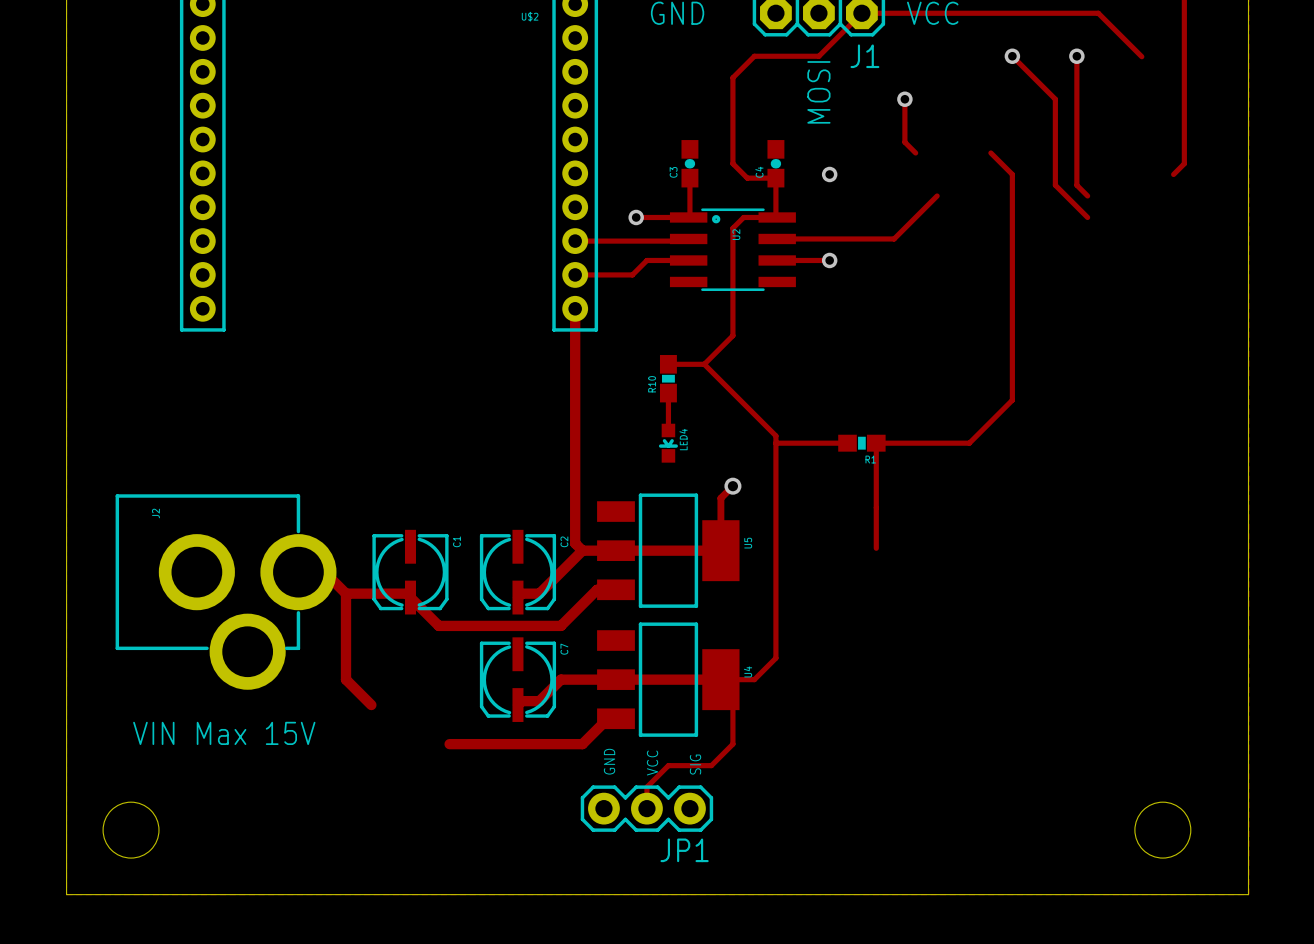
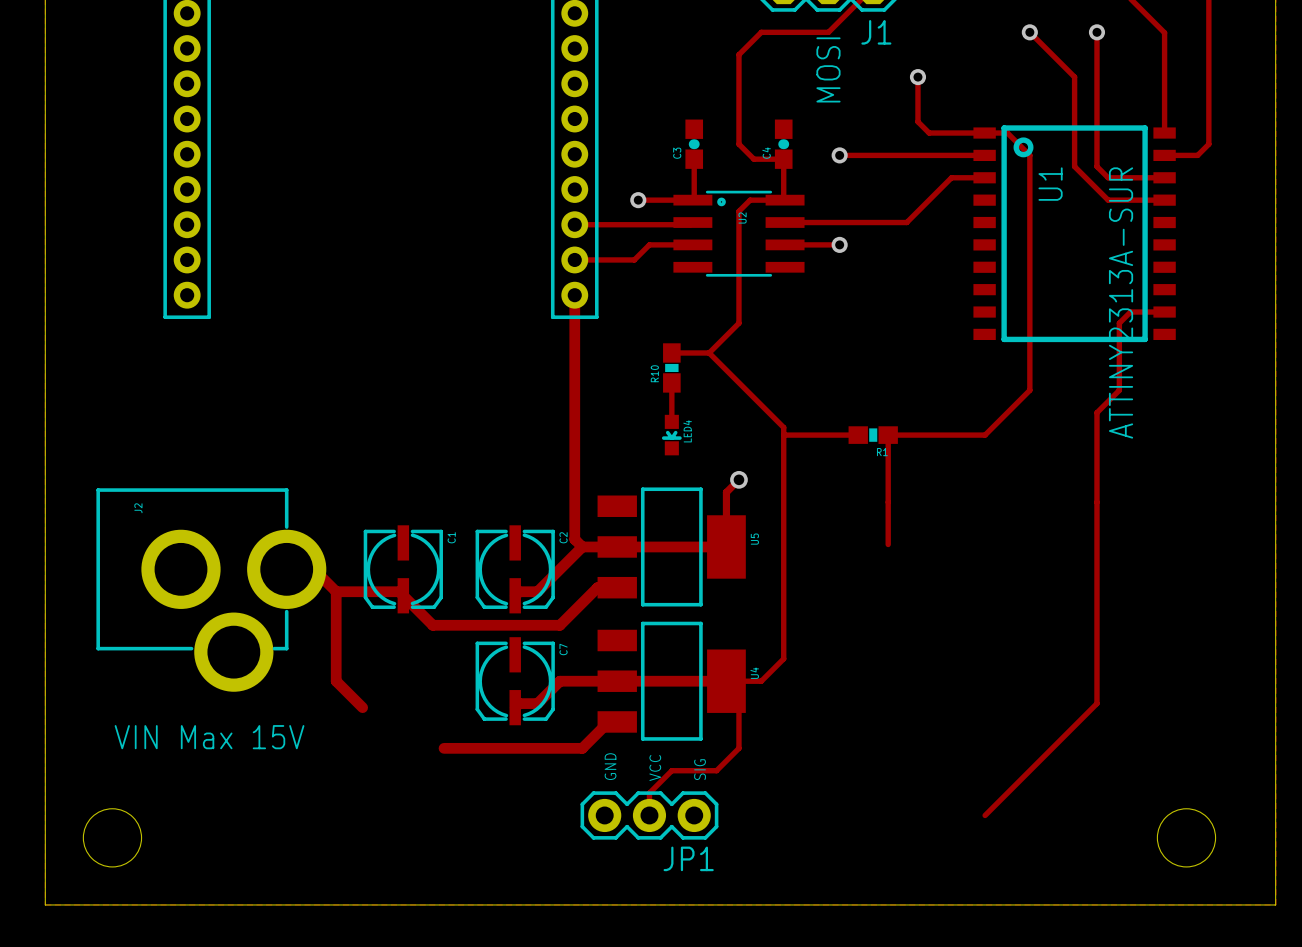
track: none -> (1164, 32) (1164, 133)
track: none -> (929, 133) (1007, 133)
track: none -> (839, 155) (984, 155)
track: none -> (1164, 155) (1197, 155)
track: none -> (951, 177) (984, 177)
track: none -> (1108, 177) (1164, 177)
track: none -> (1108, 200) (1164, 200)
U1: none -> ATTINY2313A-SUR (1074, 233)
track: none -> (1164, 312) (1130, 312) (1119, 323) (1119, 390) (1096, 412) (1096, 703) (985, 815)

